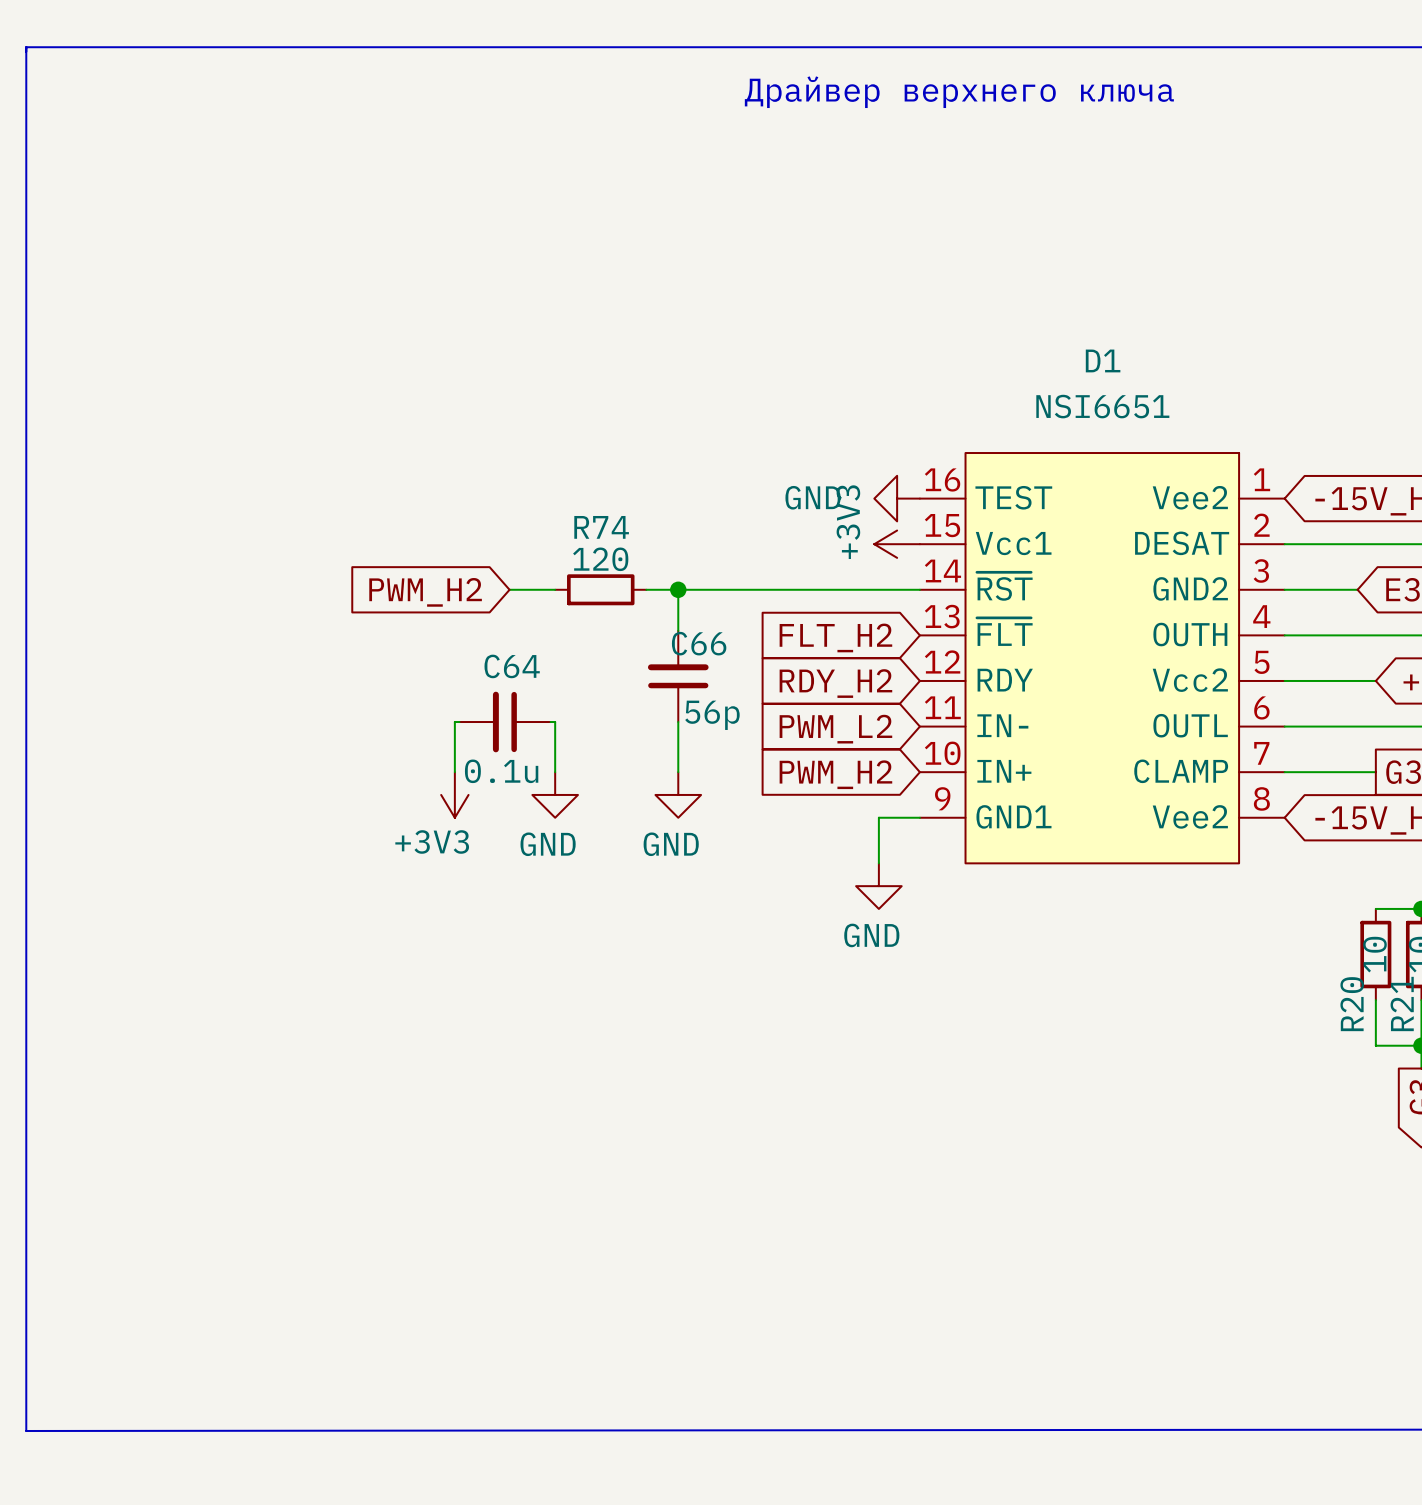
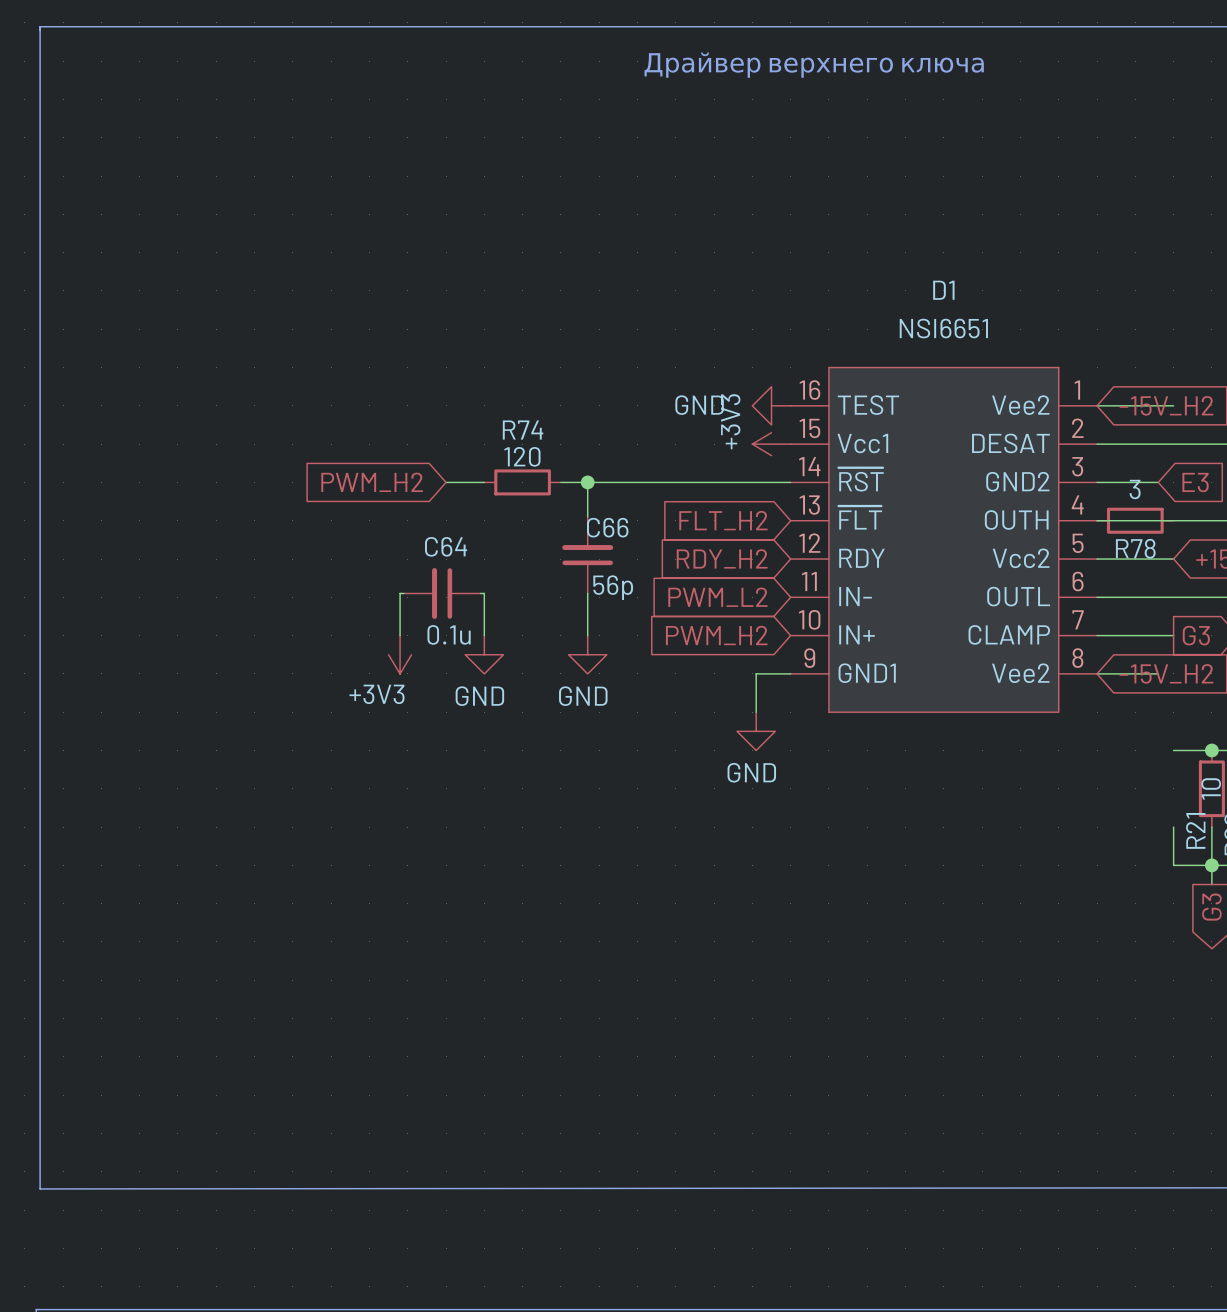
wire: none -> (1097, 405) (1173, 405)
R78: none -> 3 (1135, 520)
wire: none -> (1097, 673) (1158, 673)
R20: 10 (1375, 954) -> none

